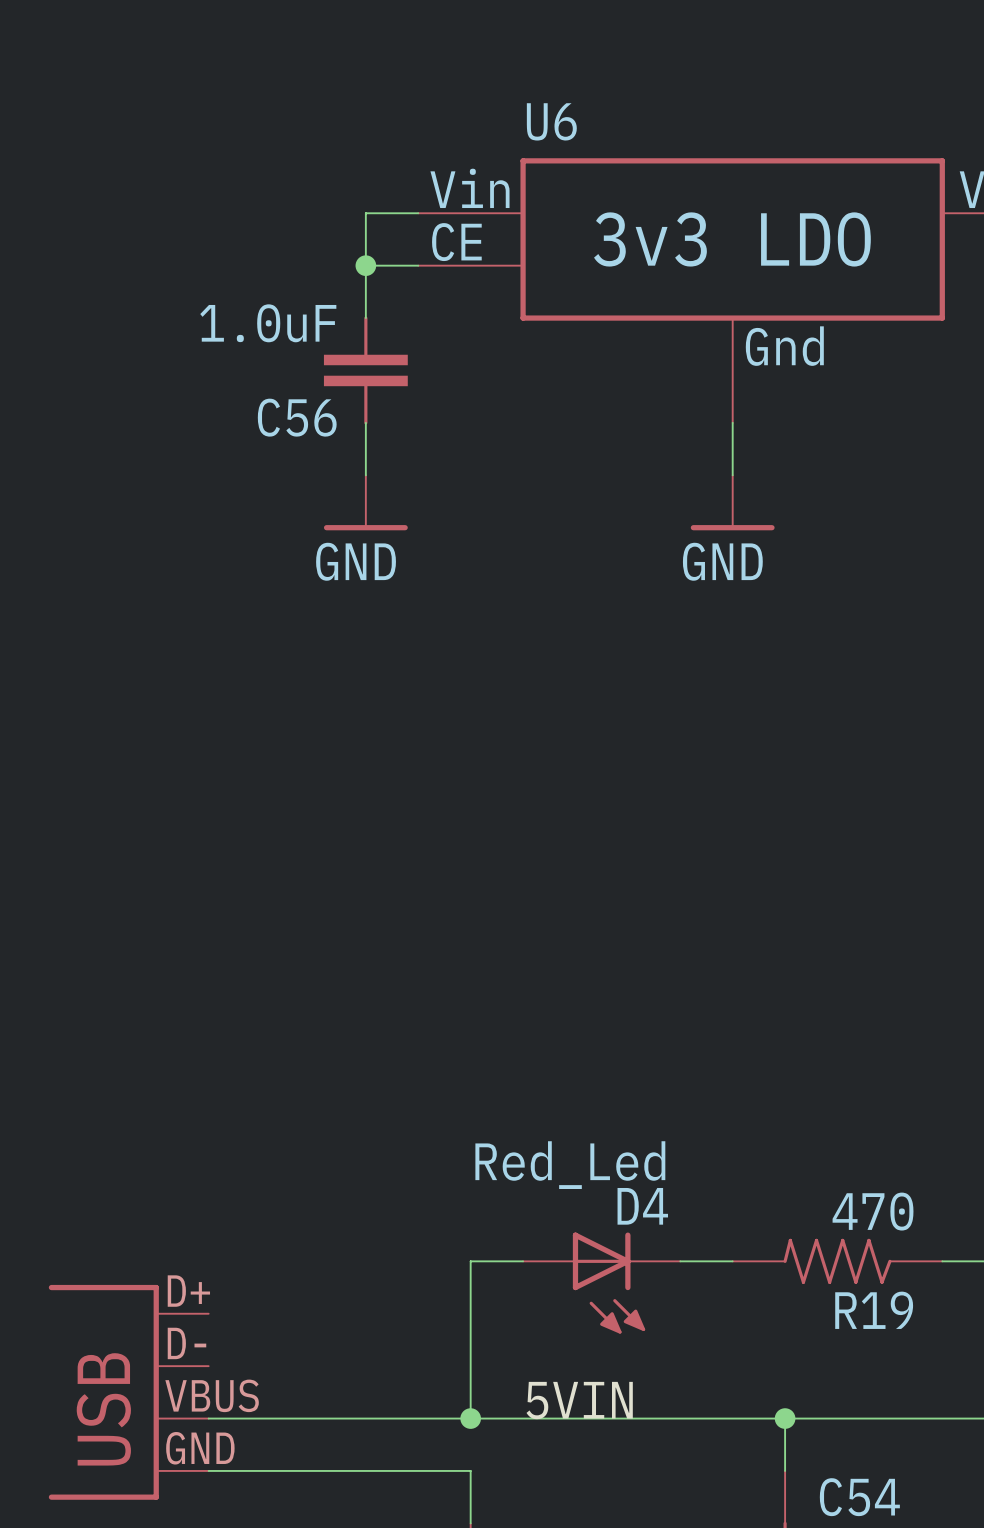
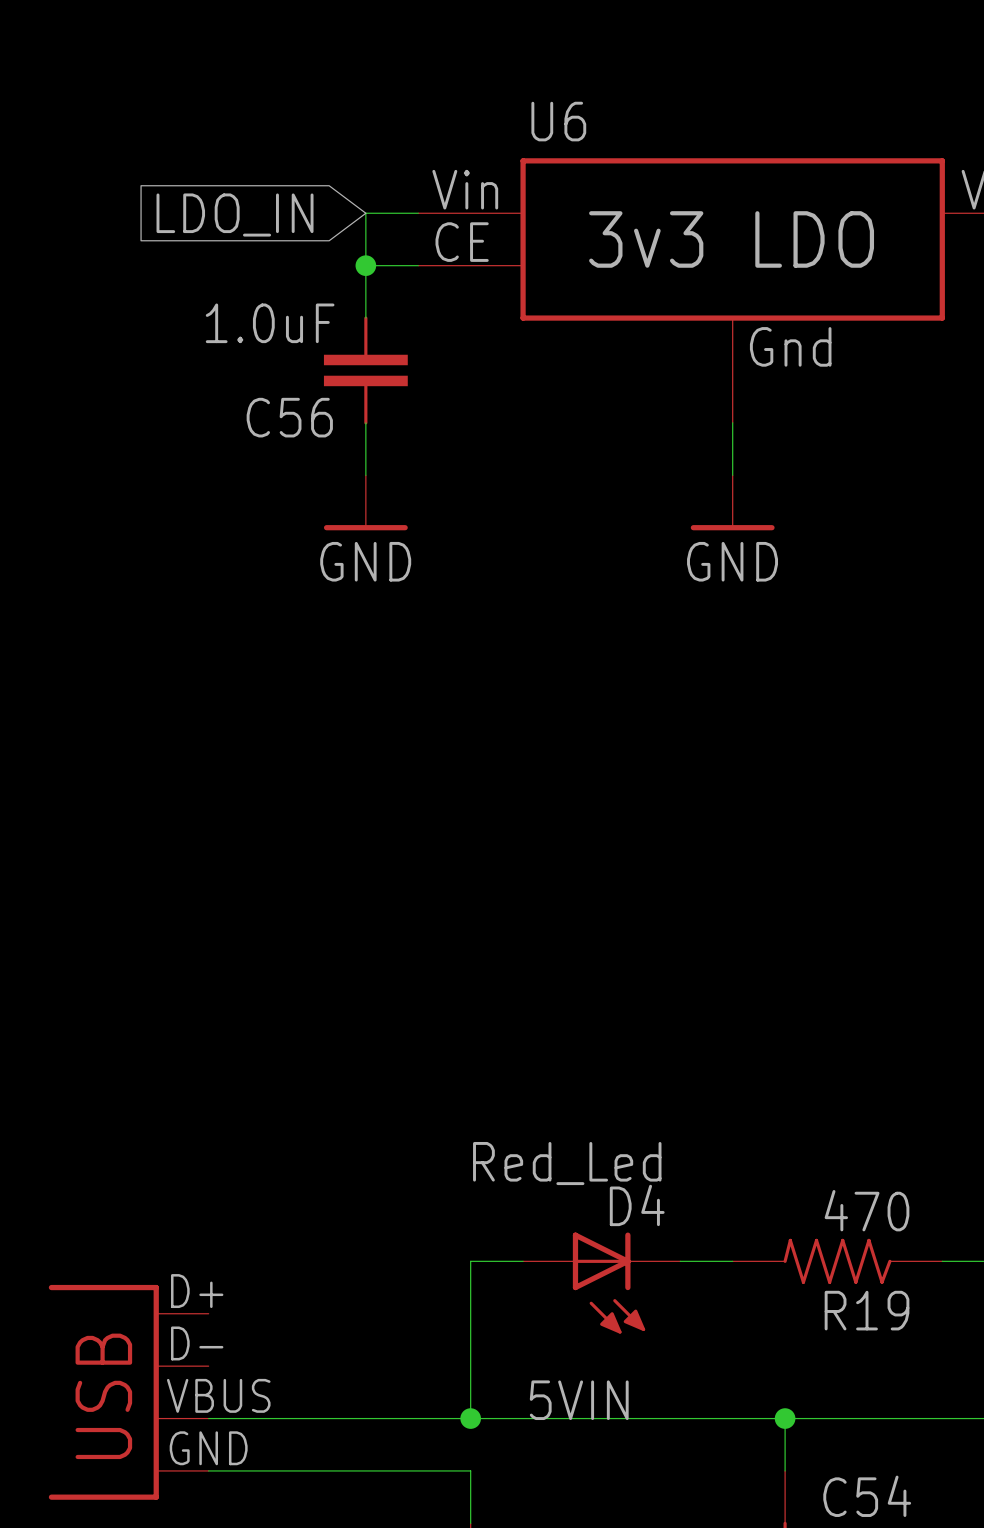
global label: none -> LDO_IN (235, 215)

